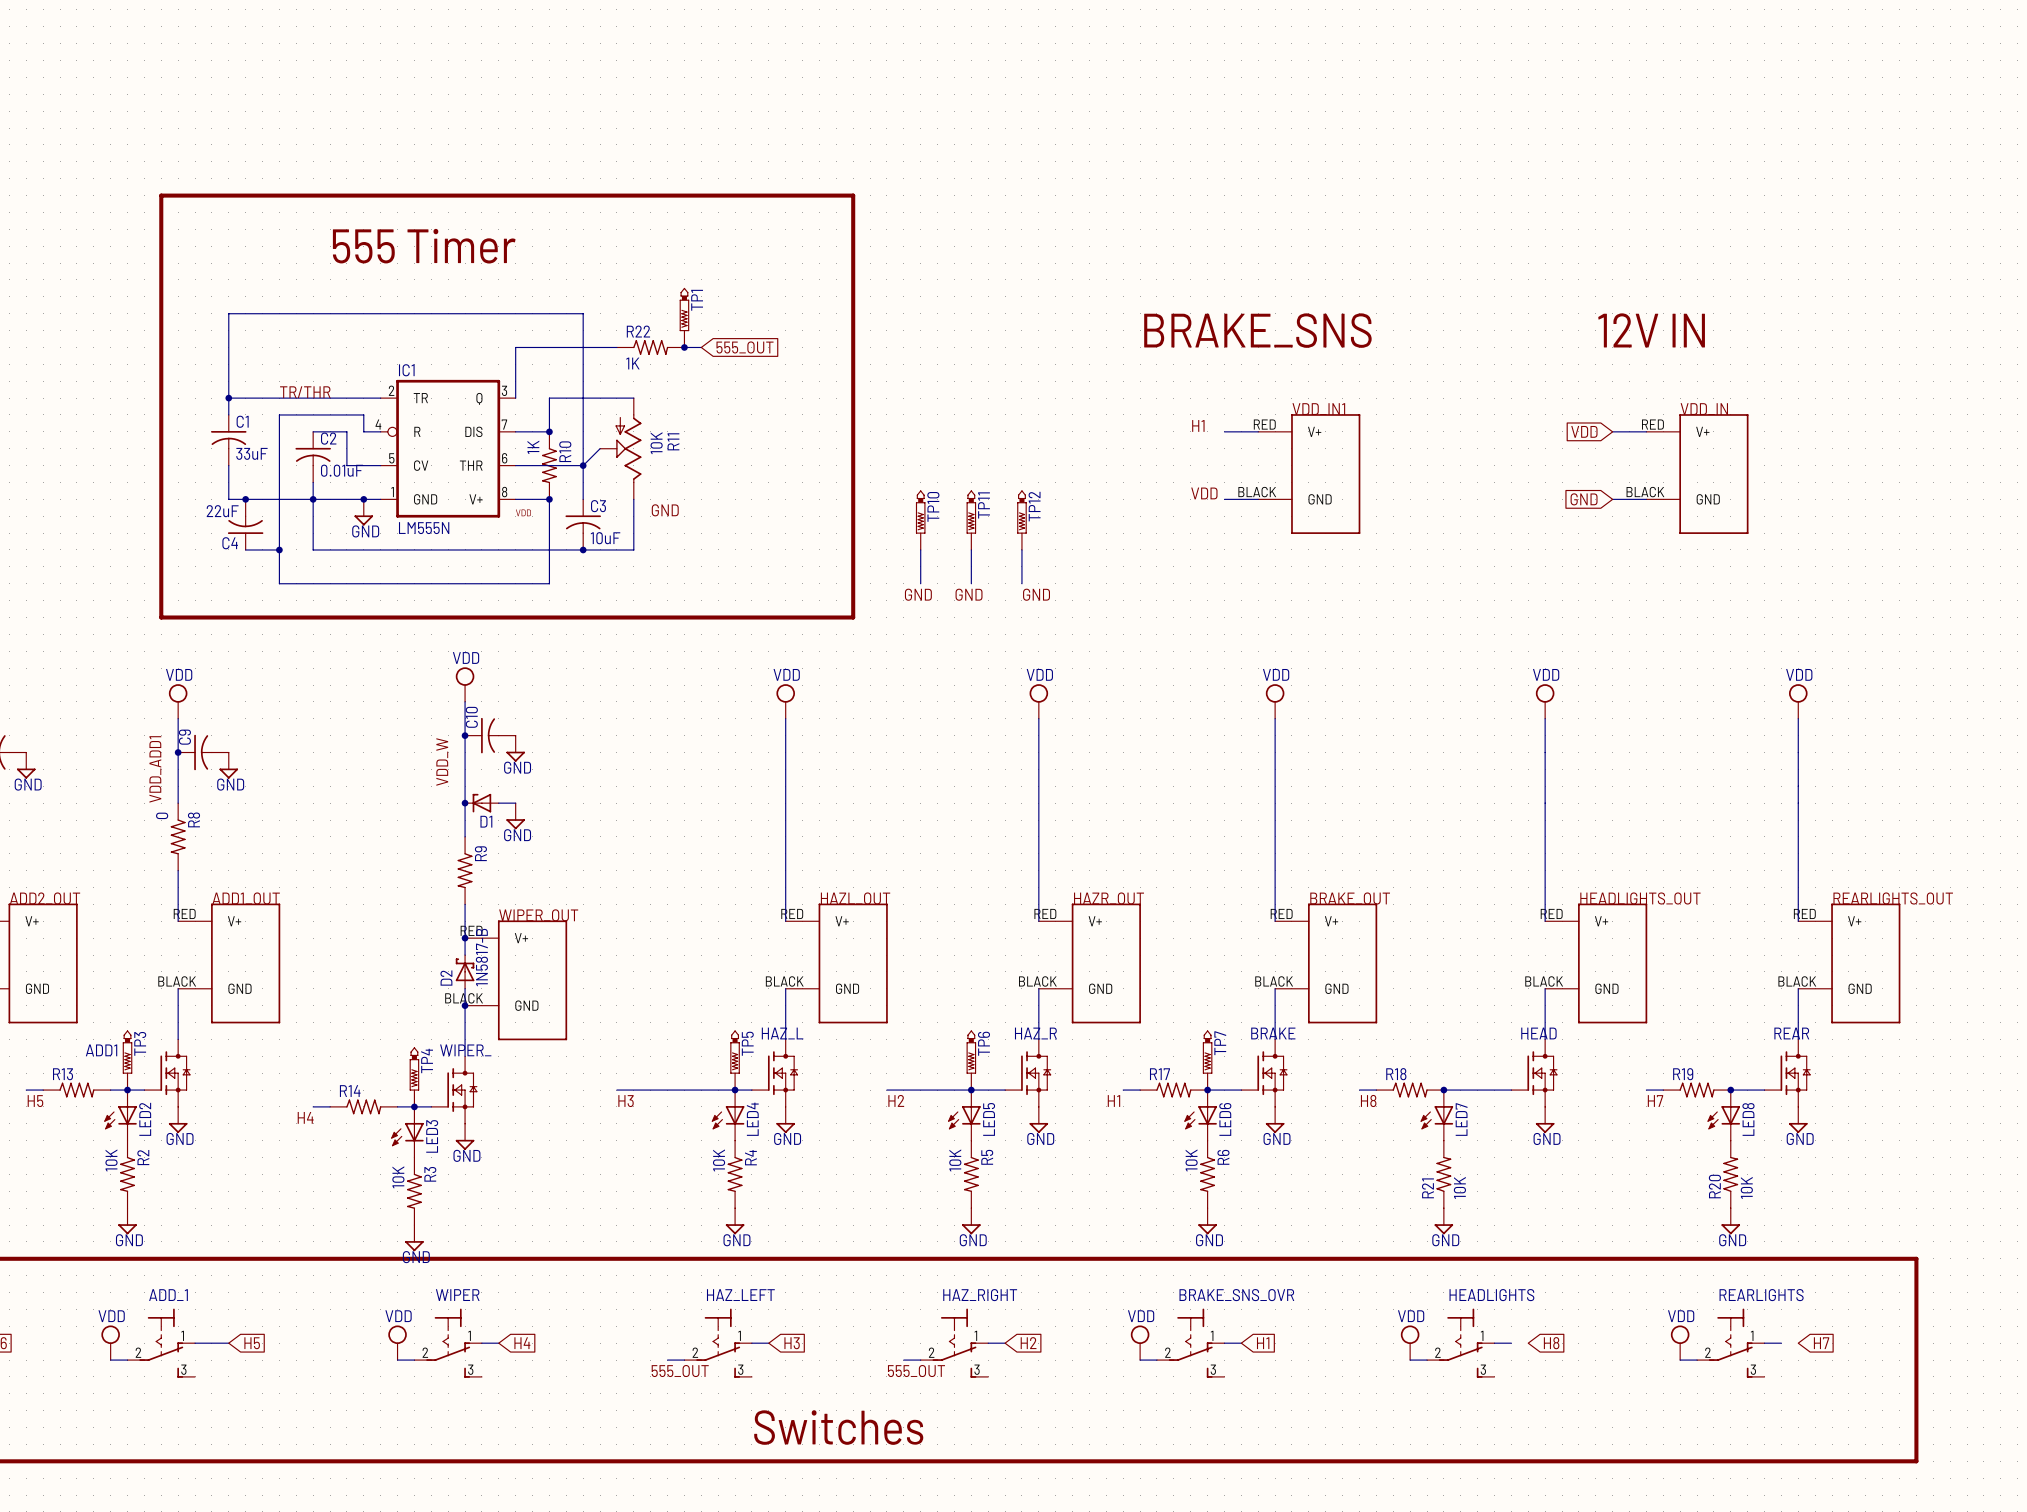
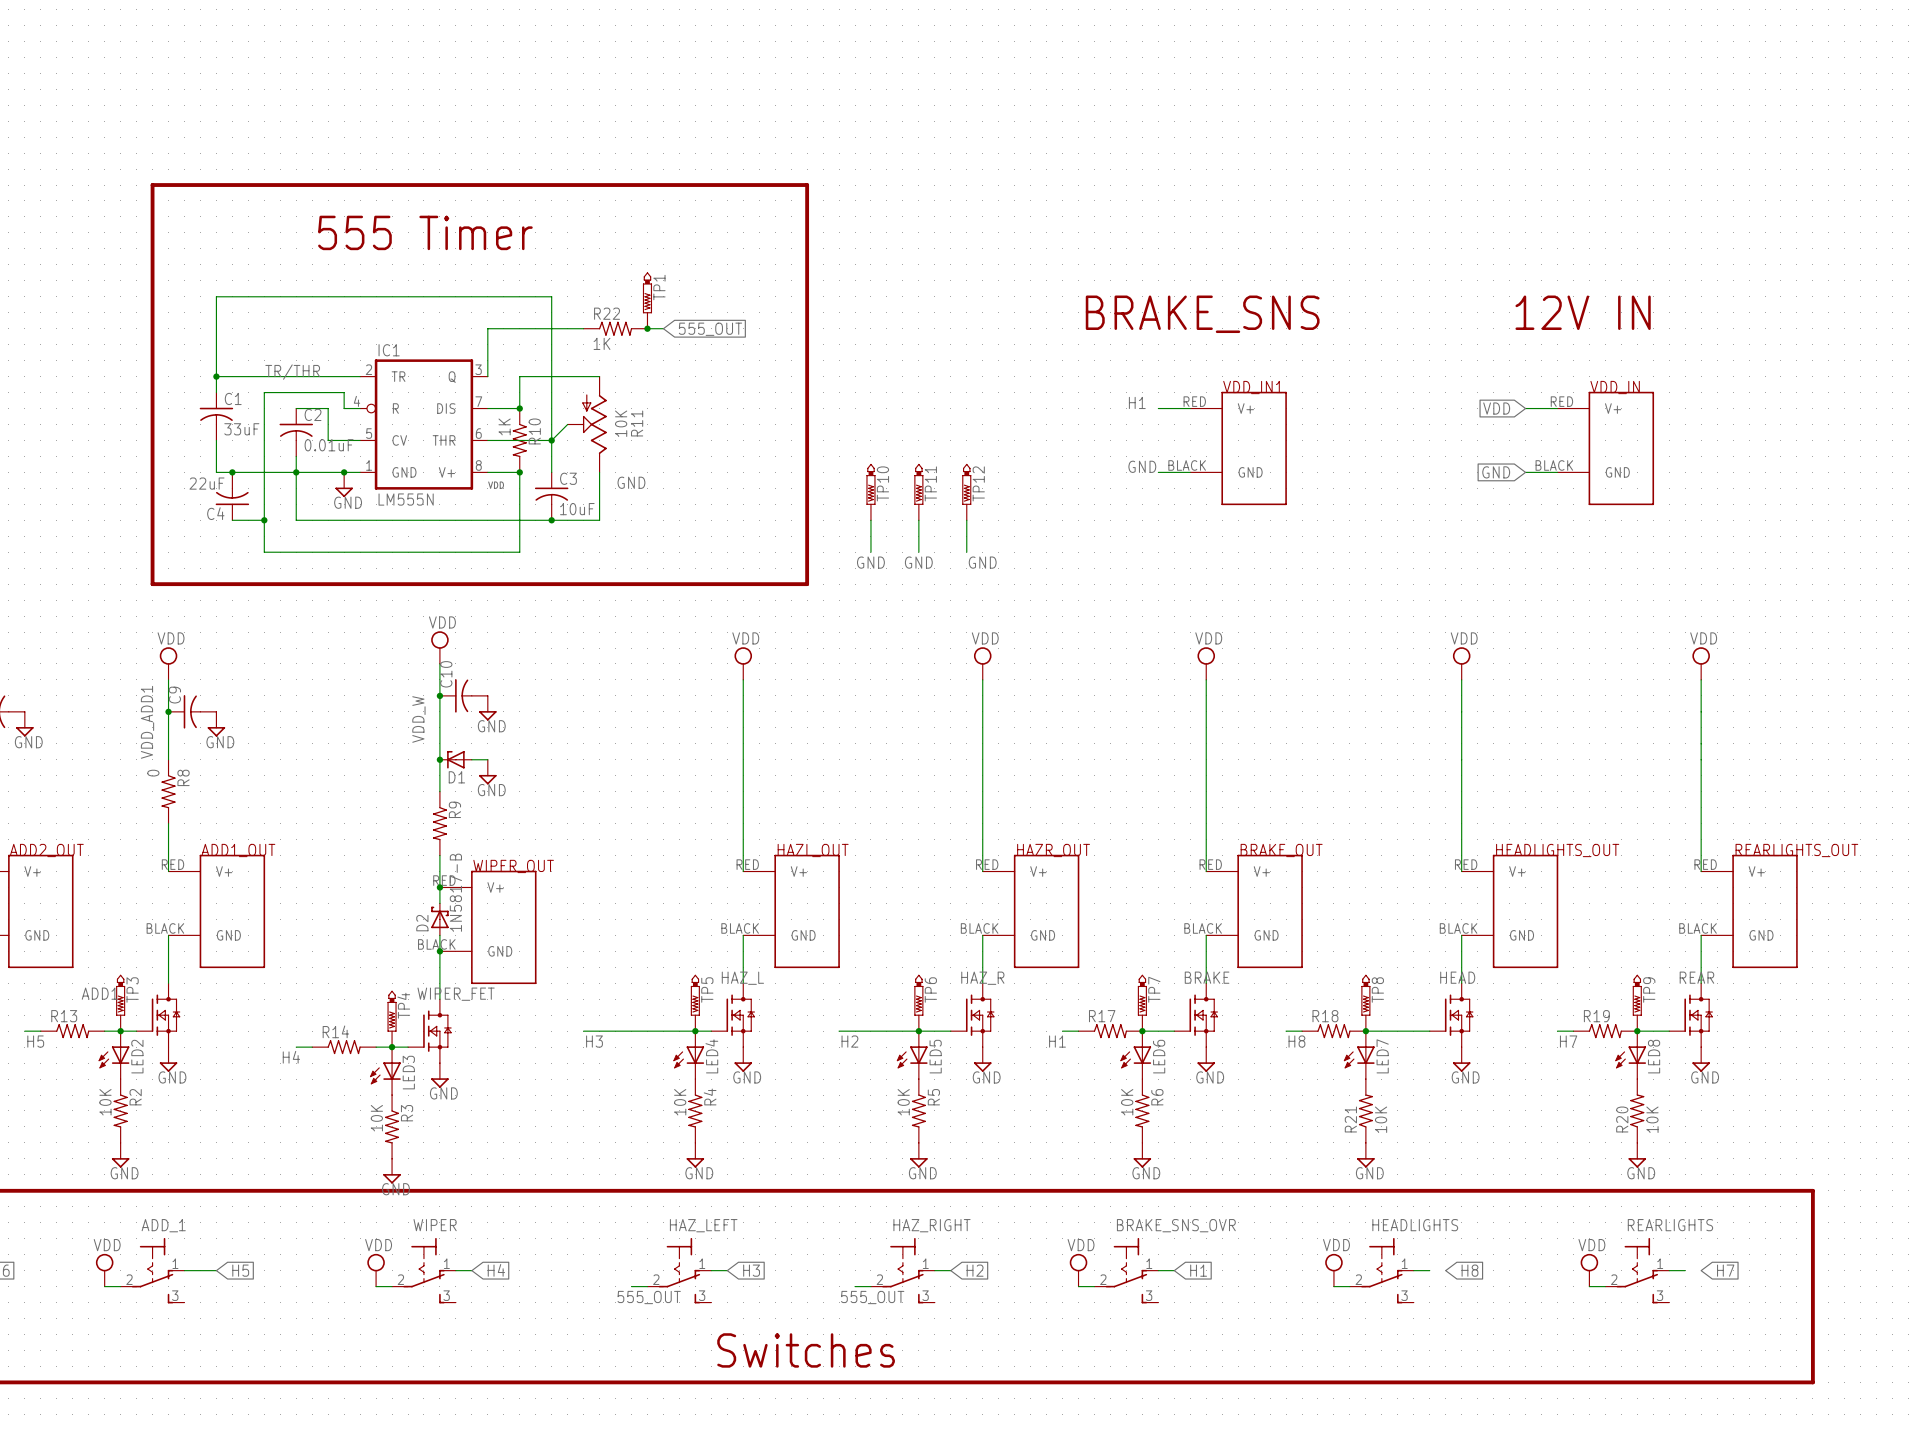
label: VDD (1204, 493) -> GND (1142, 466)
WIPER_ name: WIPER_ (465, 1050) -> WIPER_FET (456, 994)
TP8: none -> (1365, 1002)
TP9: none -> (1637, 1002)

